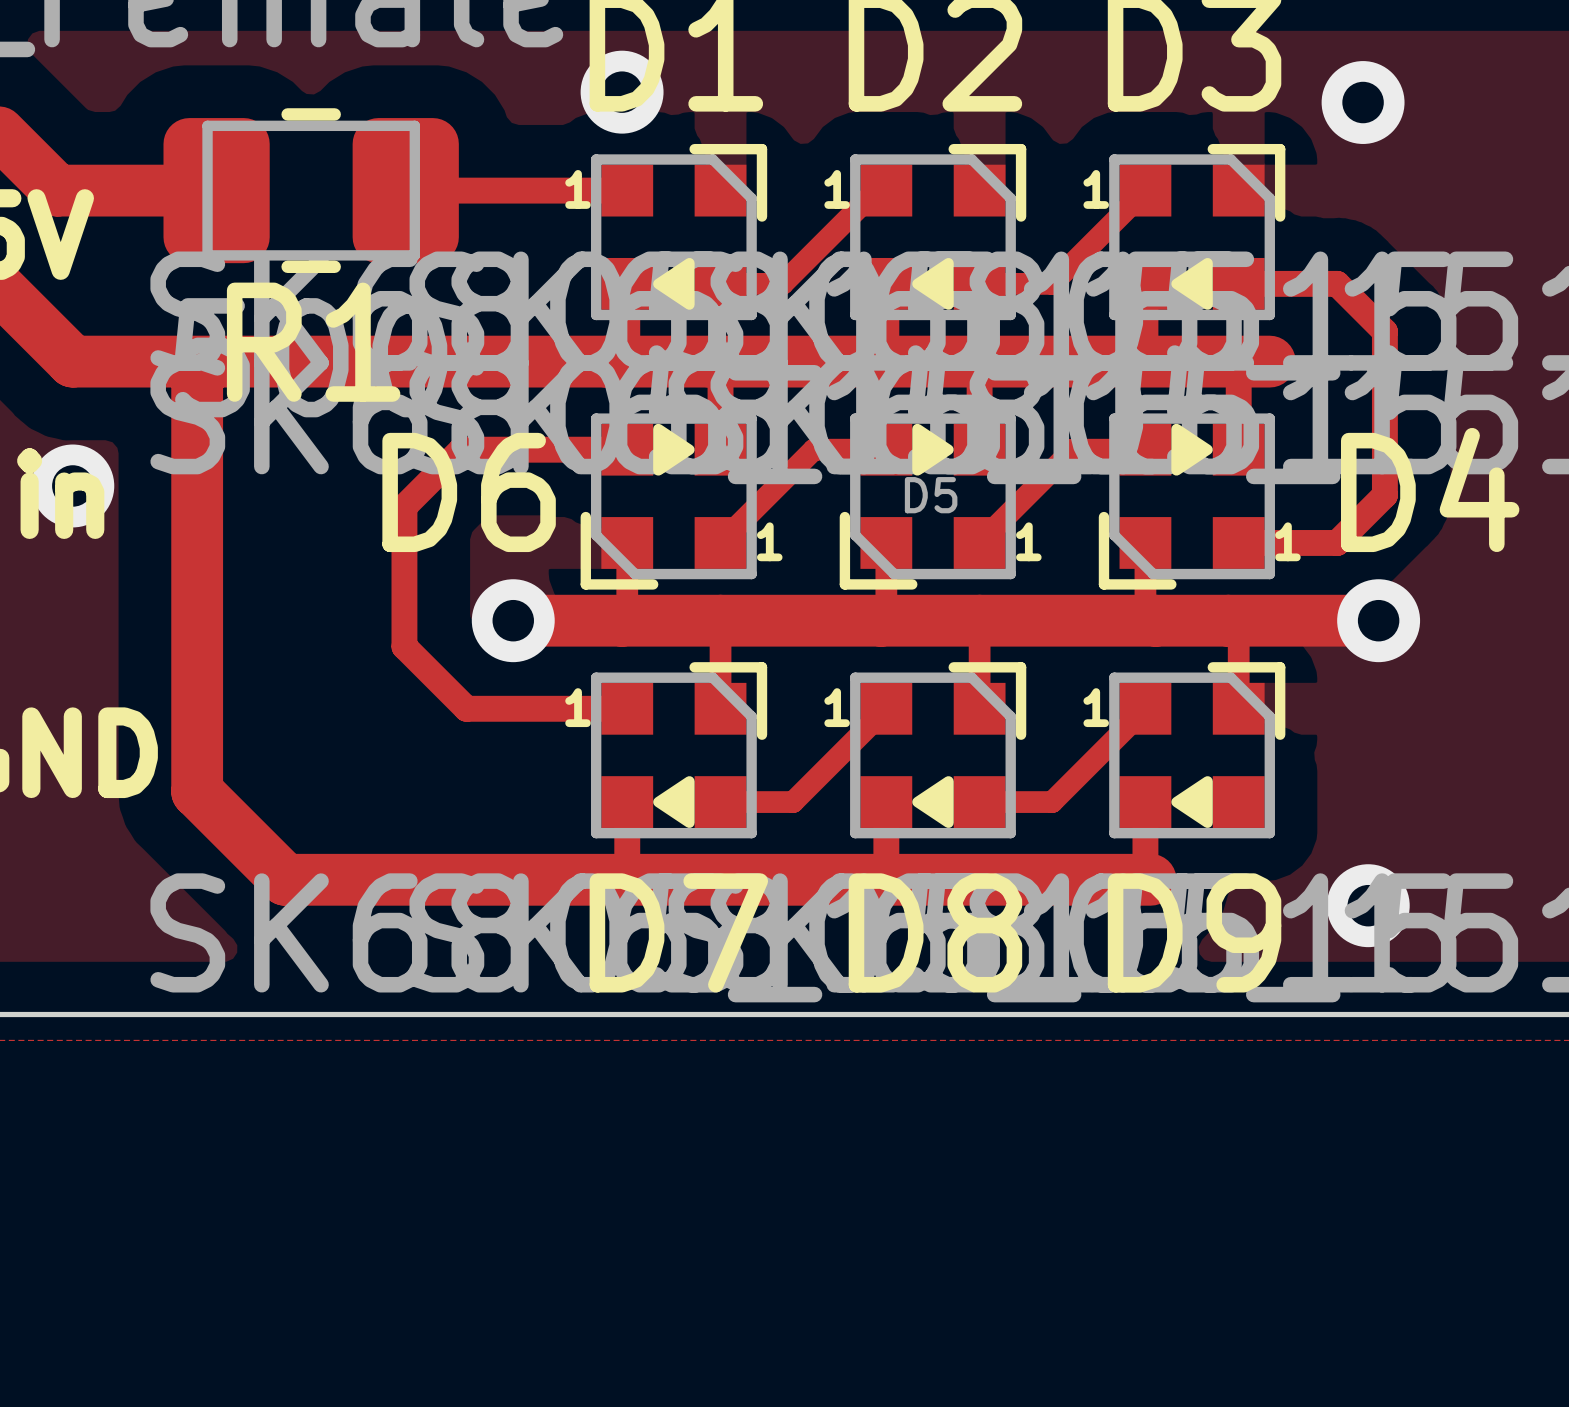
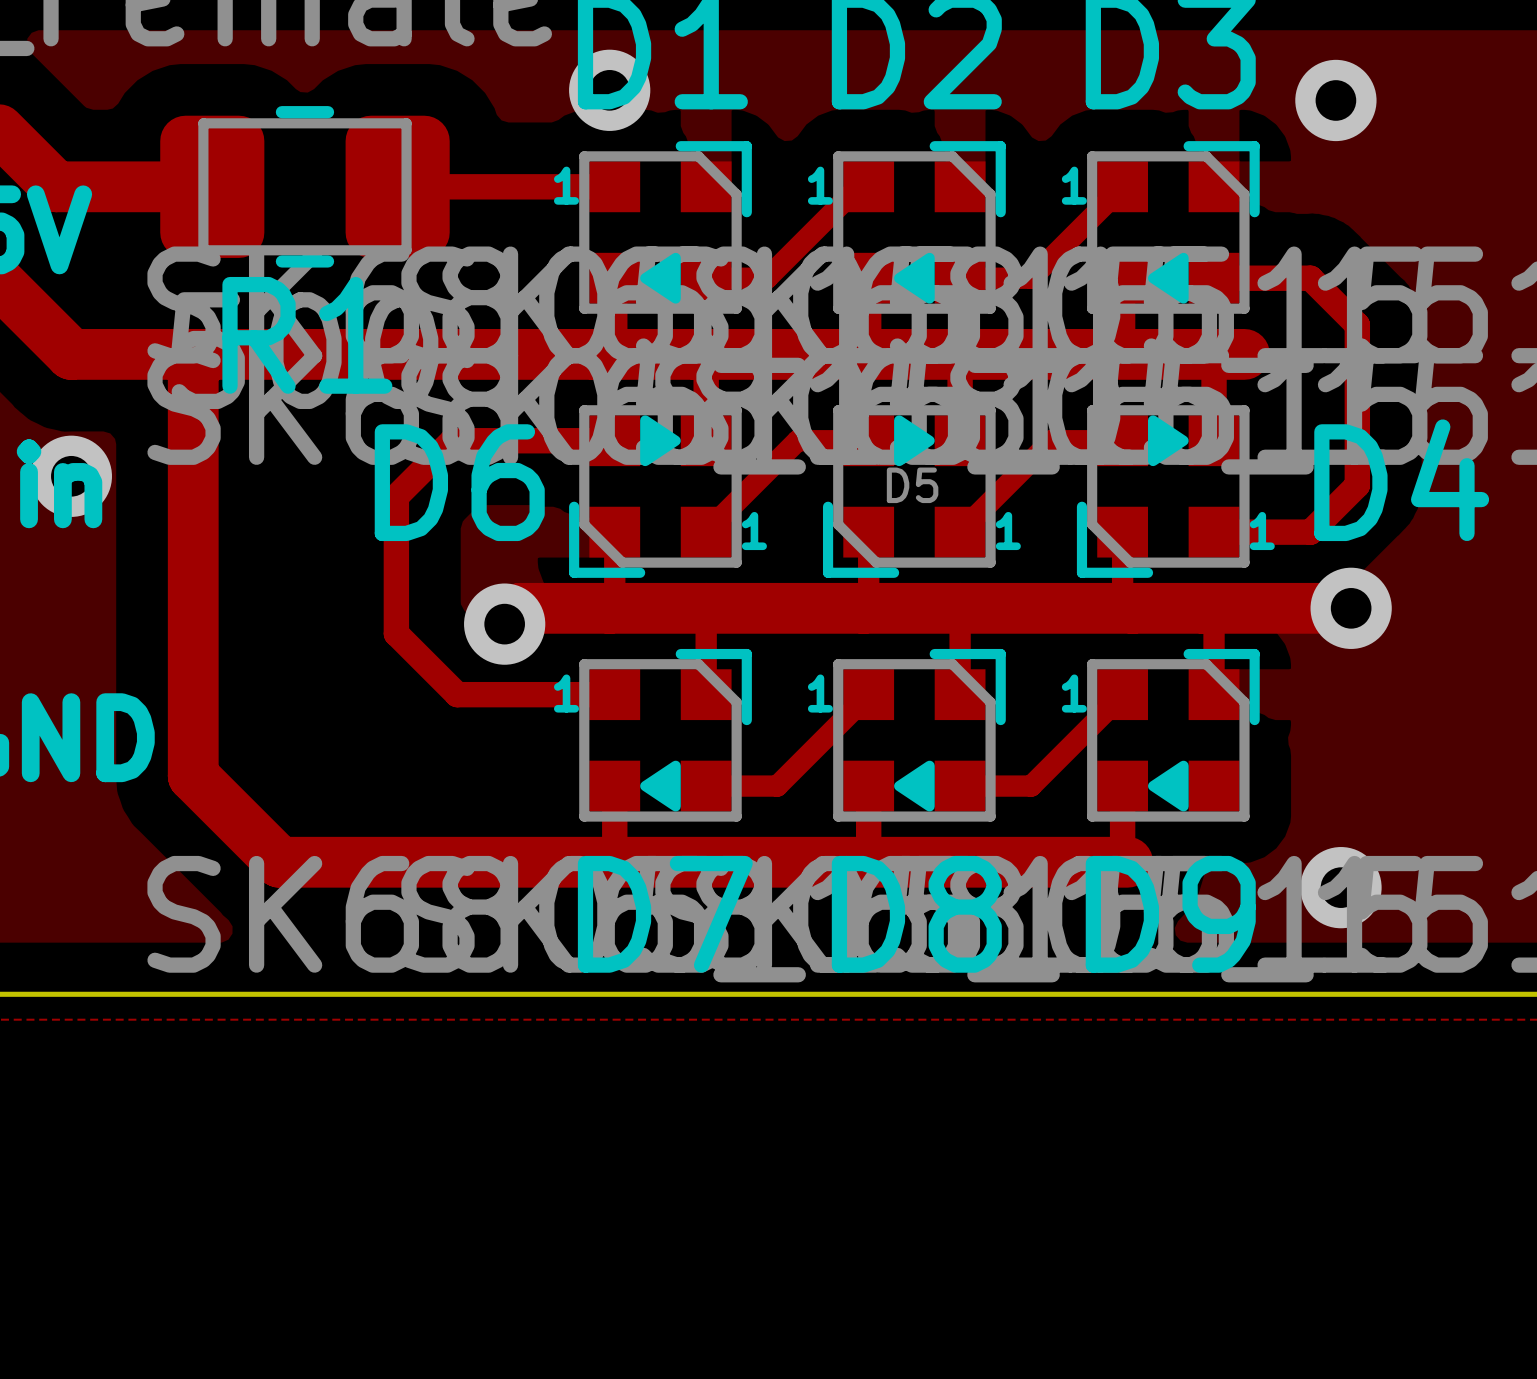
via position: (513, 620) -> (504, 624)

